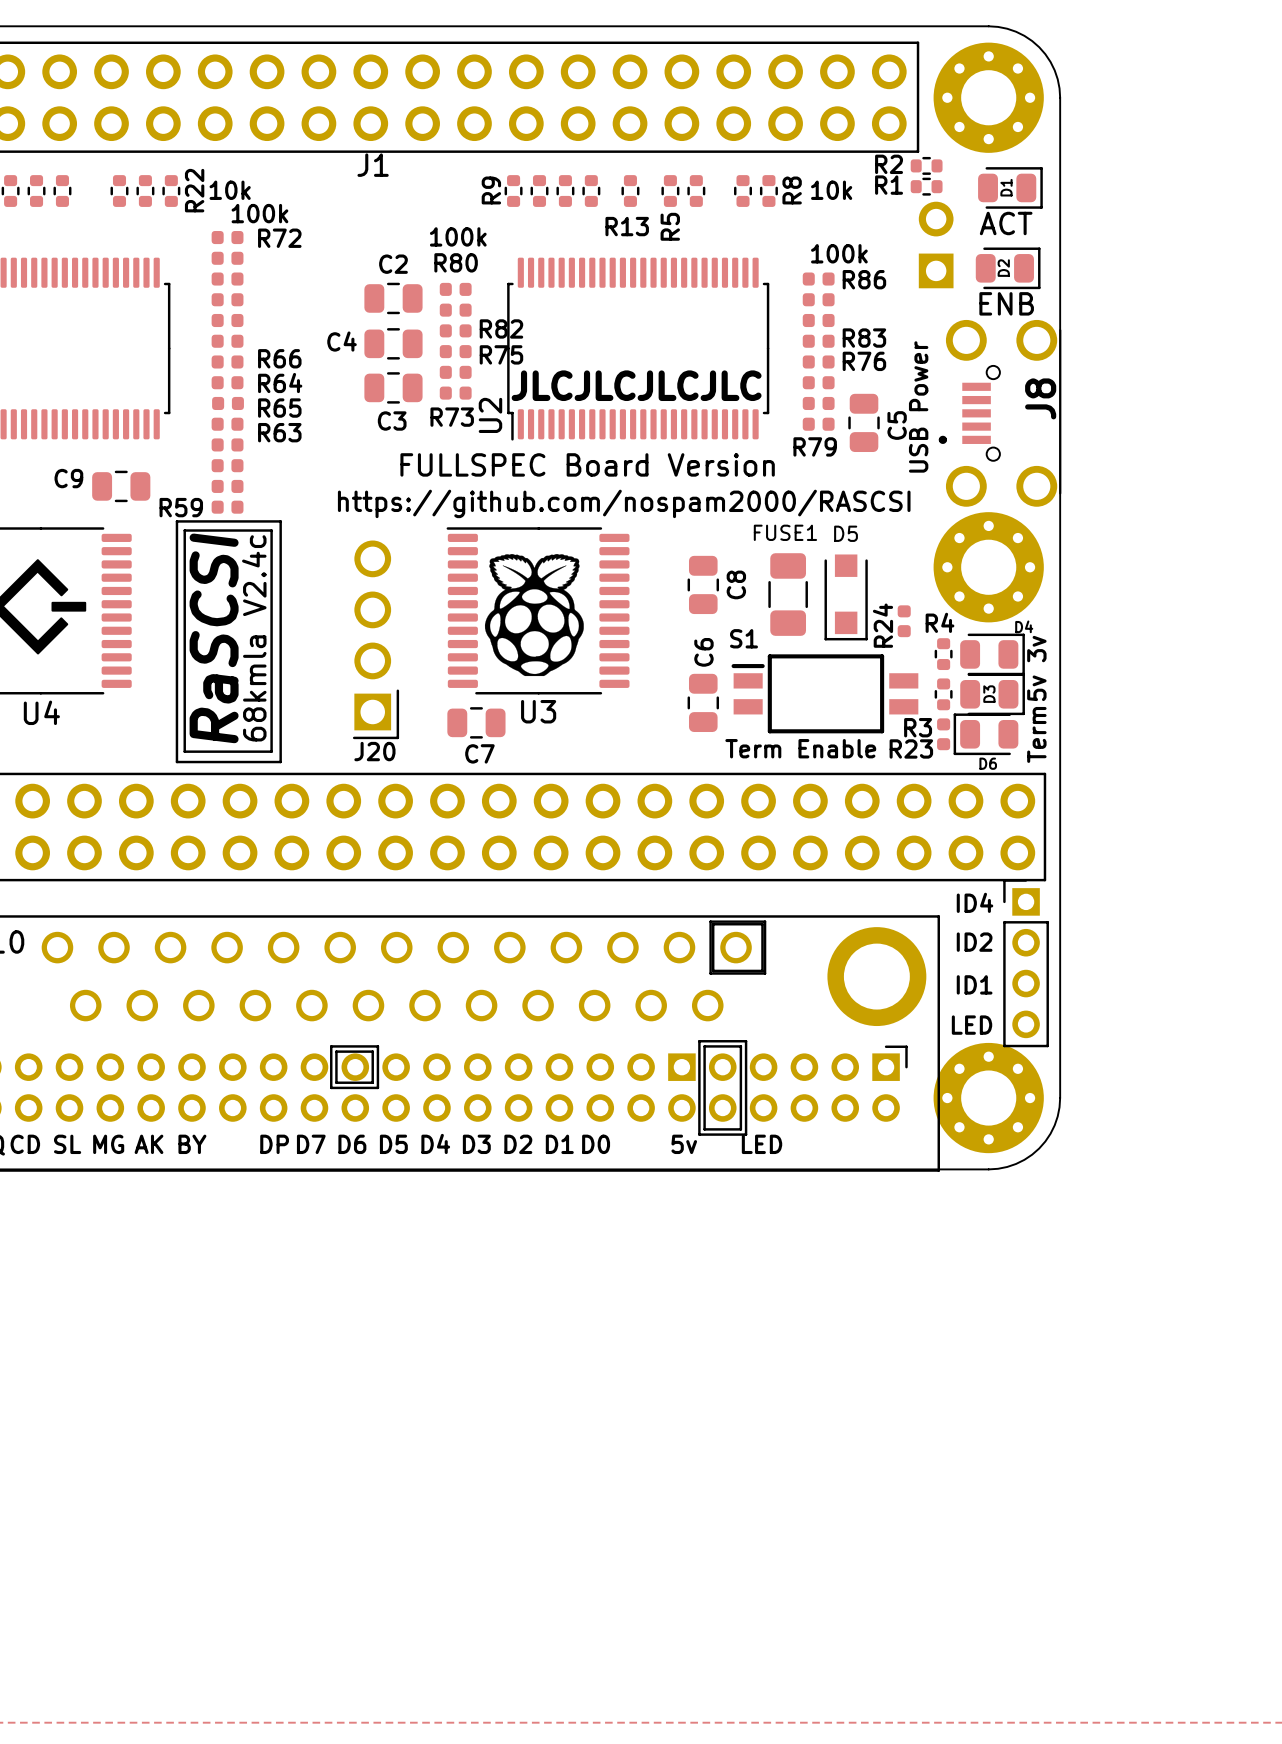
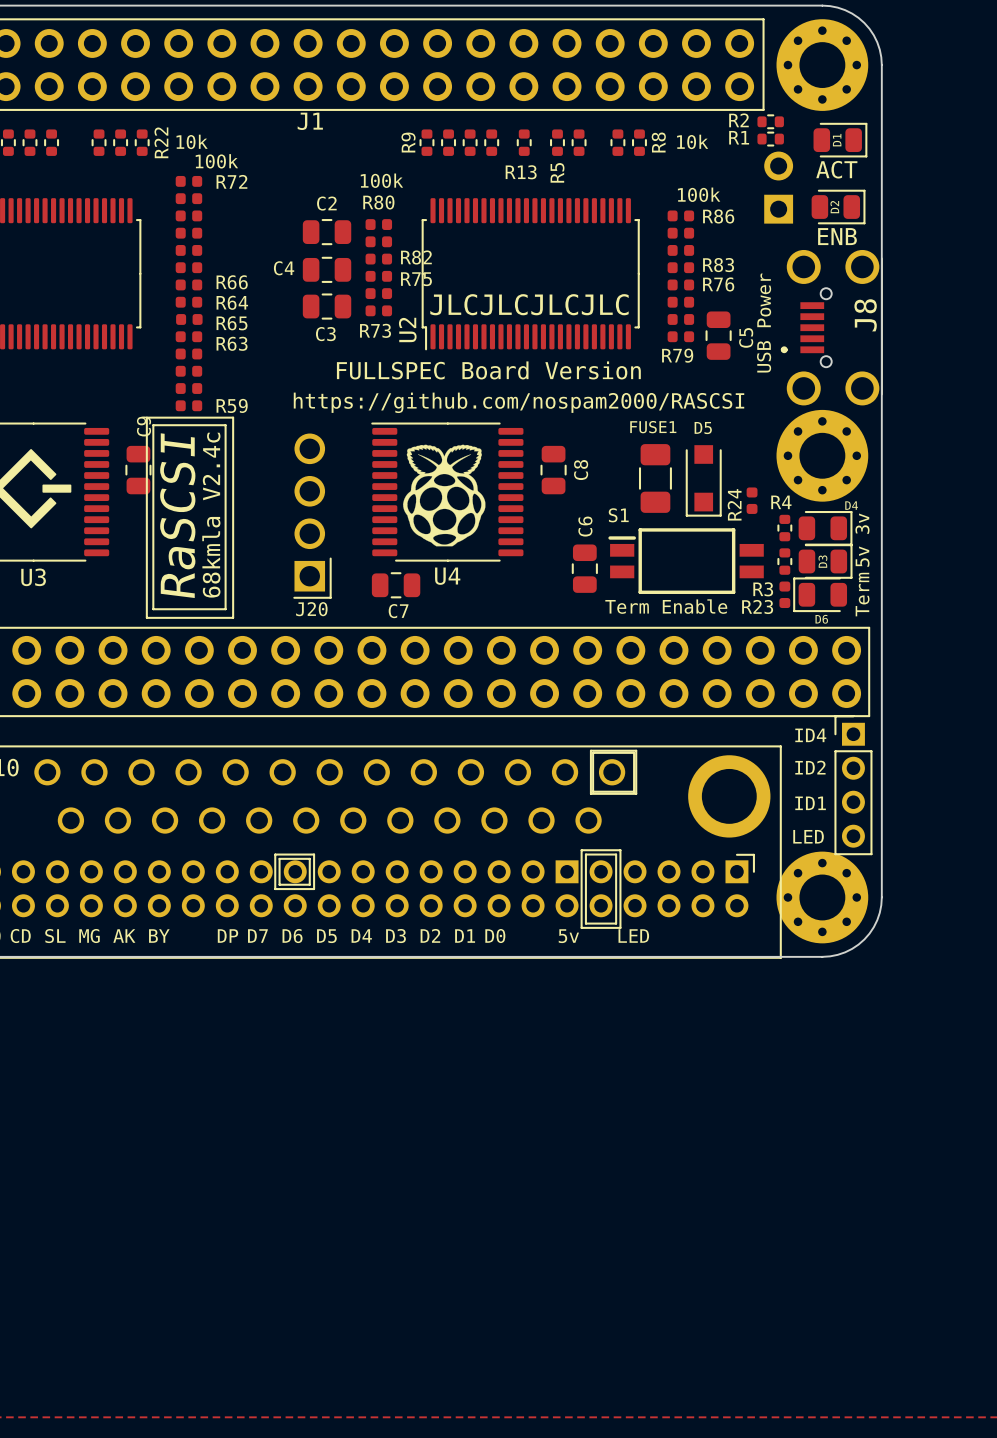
C9 rotation: 0° (121, 486) -> 90° clockwise (138, 470)
C9 position: (121, 486) -> (138, 470)
R59 name position: R59 (181, 507) -> R59 (232, 405)
C8 position: (703, 584) -> (553, 470)
U3 name: U3 (538, 711) -> U4 (447, 576)
U4 name: U4 (41, 712) -> U3 (33, 577)

